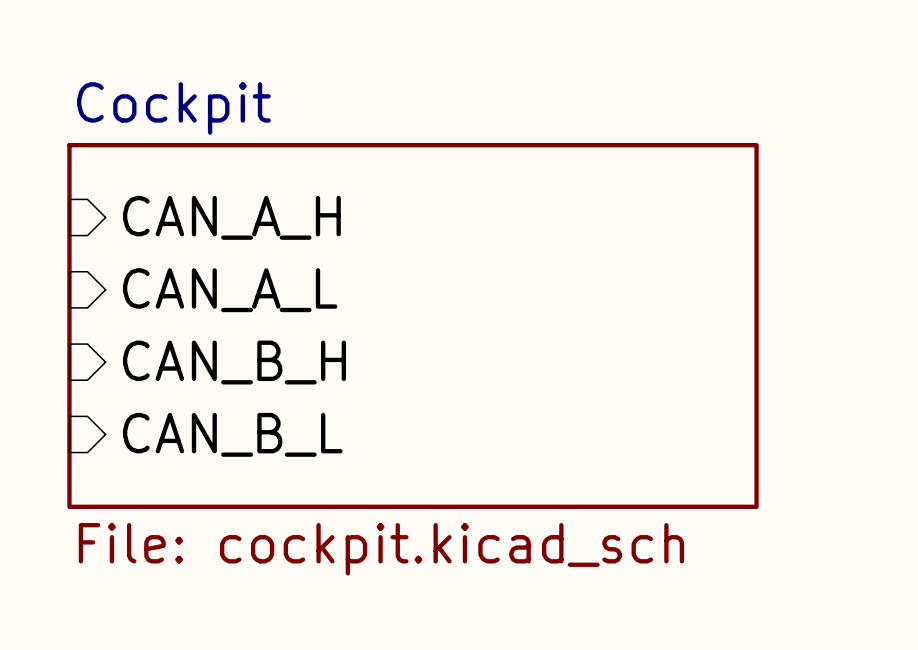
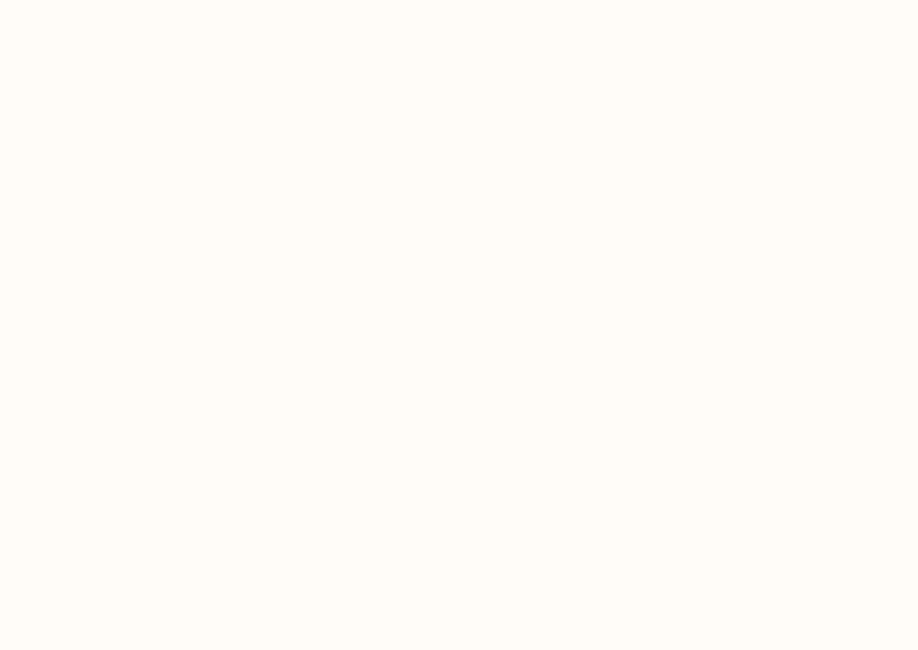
sheet pin: CAN_A_H (231, 217) -> none
sheet pin: CAN_A_L (230, 290) -> none
sheet Cockpit: File: cockpit.kicad_sch (413, 325) -> none
sheet pin: CAN_B_H (234, 362) -> none
sheet pin: CAN_B_L (232, 434) -> none

